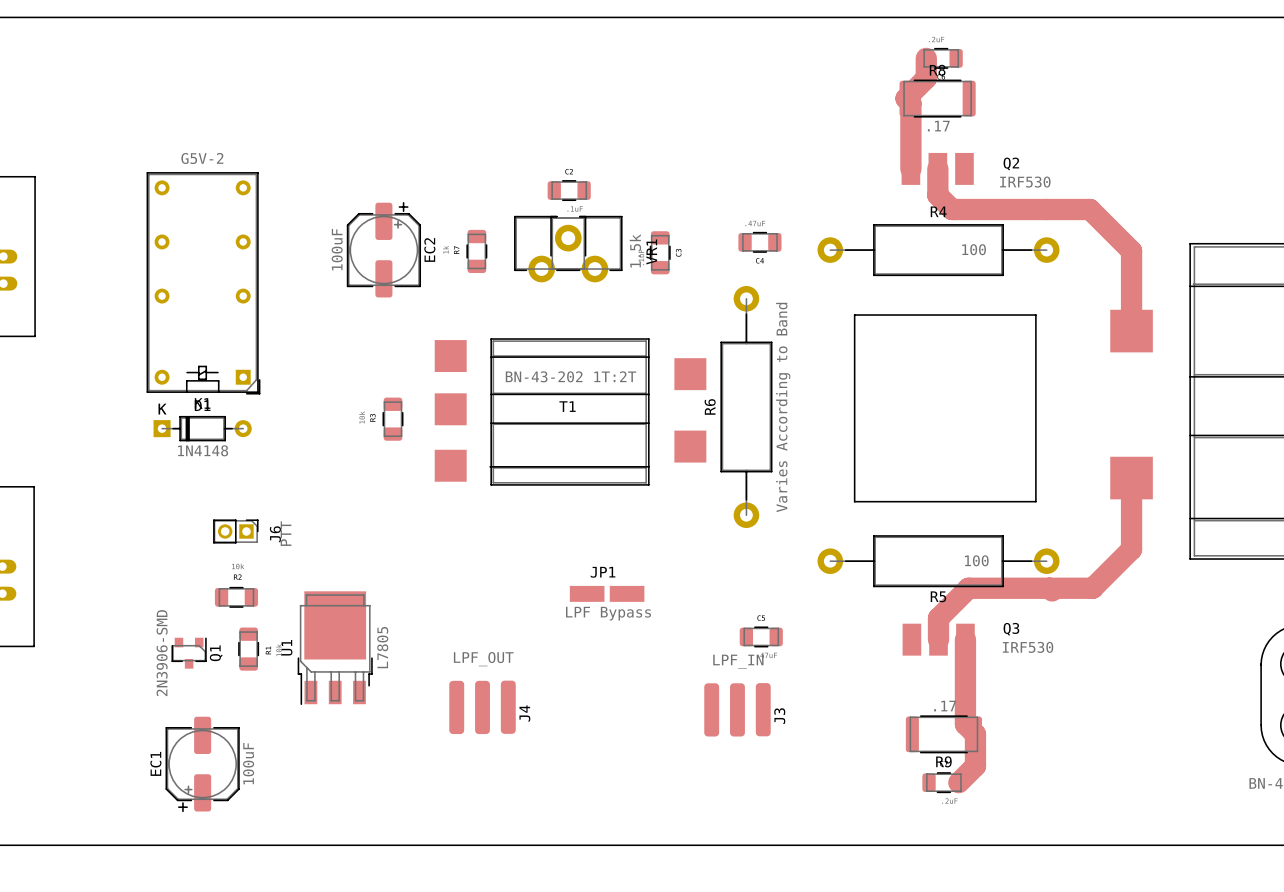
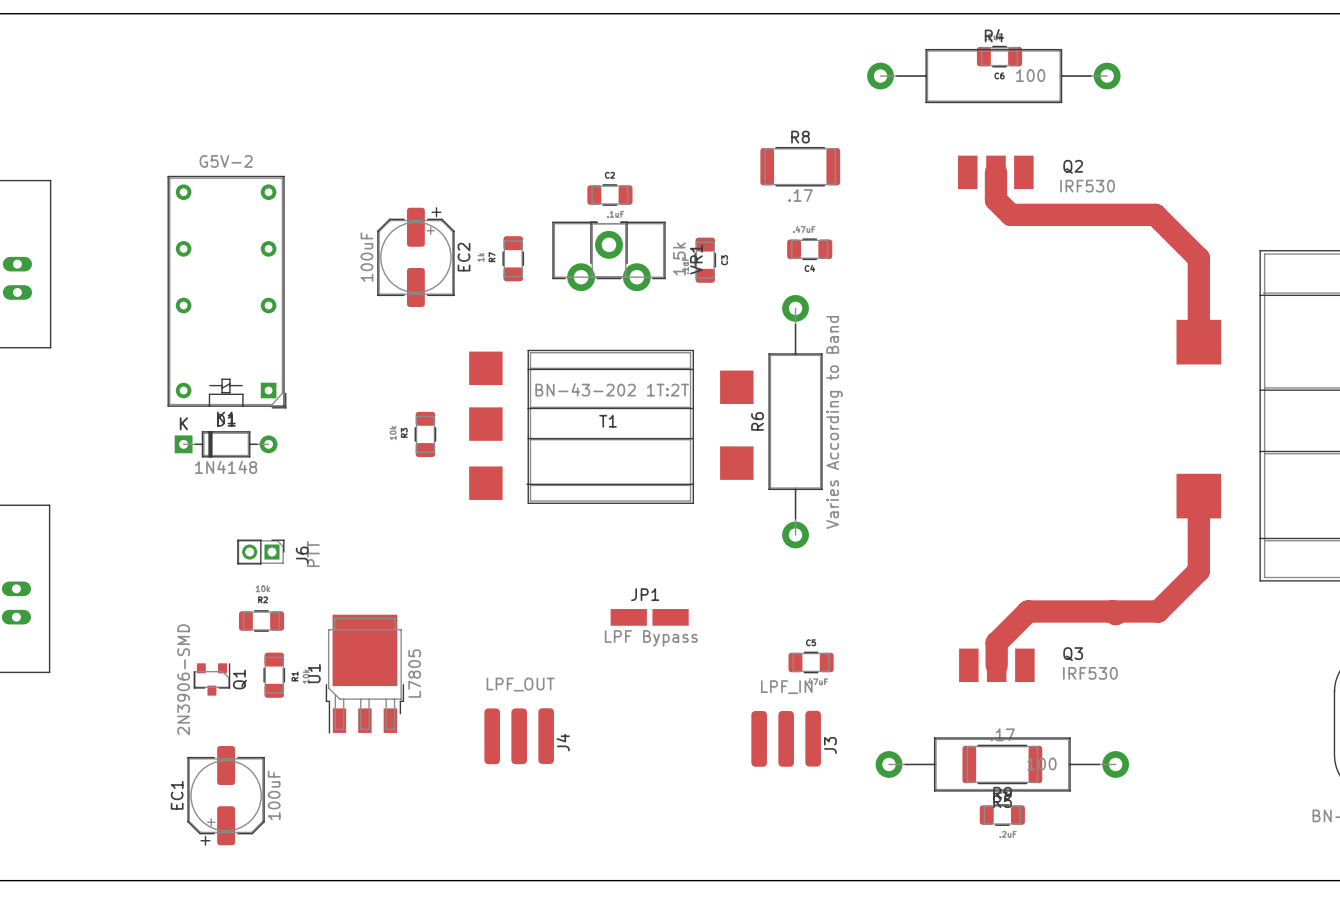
track: (926, 58) (926, 78) (906, 98) (910, 103) (910, 168) -> none
R8 position: (937, 98) -> (800, 166)
R4 position: (938, 250) -> (993, 76)
board edge: (854, 315) (1035, 315) (1035, 501) (854, 501) (854, 315) -> none
R5 position: (938, 561) -> (1002, 764)
track: (965, 639) (965, 724) (975, 734) (975, 766) (958, 782) -> none

